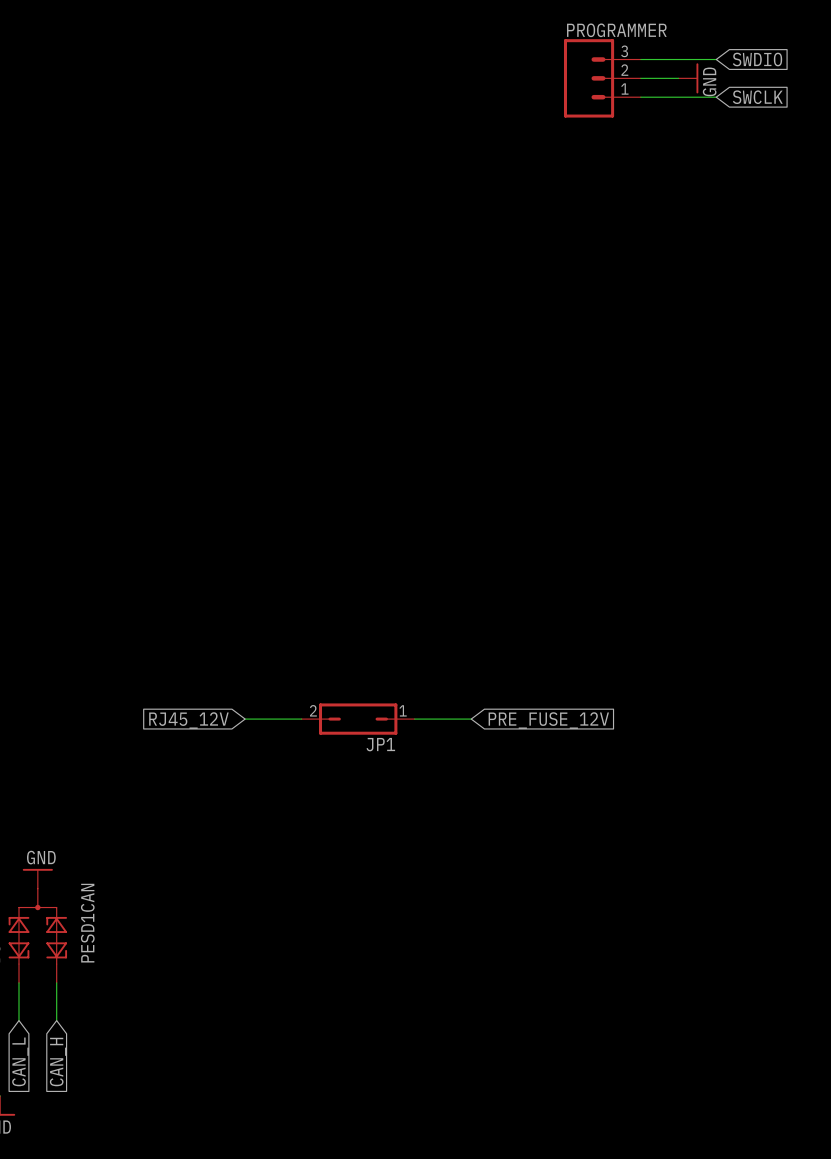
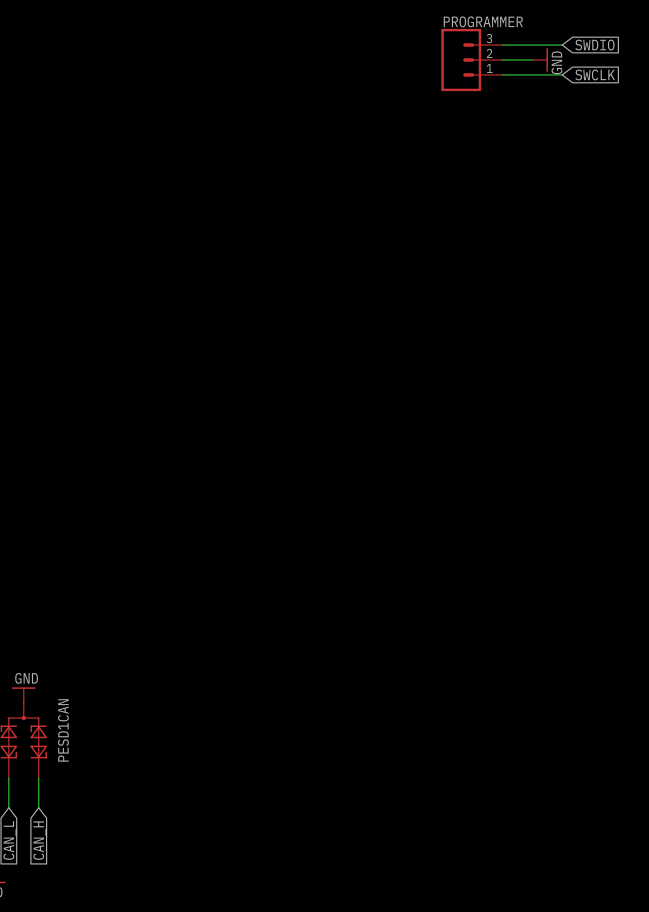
wire: (245, 719) (301, 719) -> none
JP1: (358, 719) -> none
wire: (414, 719) (471, 719) -> none
global label: RJ45_12V (188, 720) -> none
global label: PRE_FUSE_12V (548, 720) -> none

